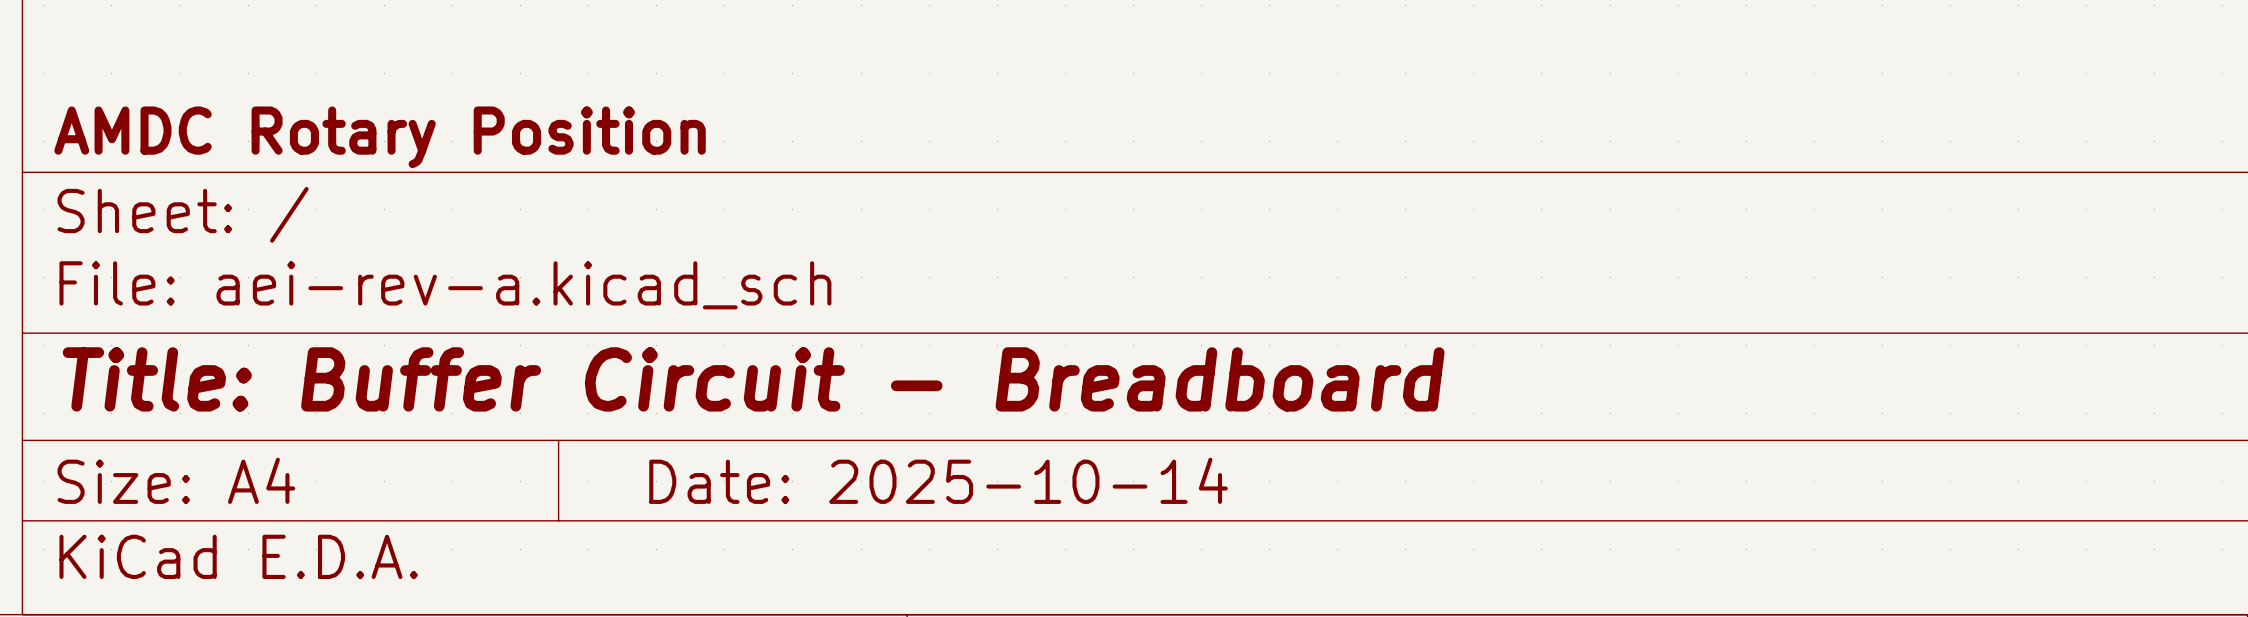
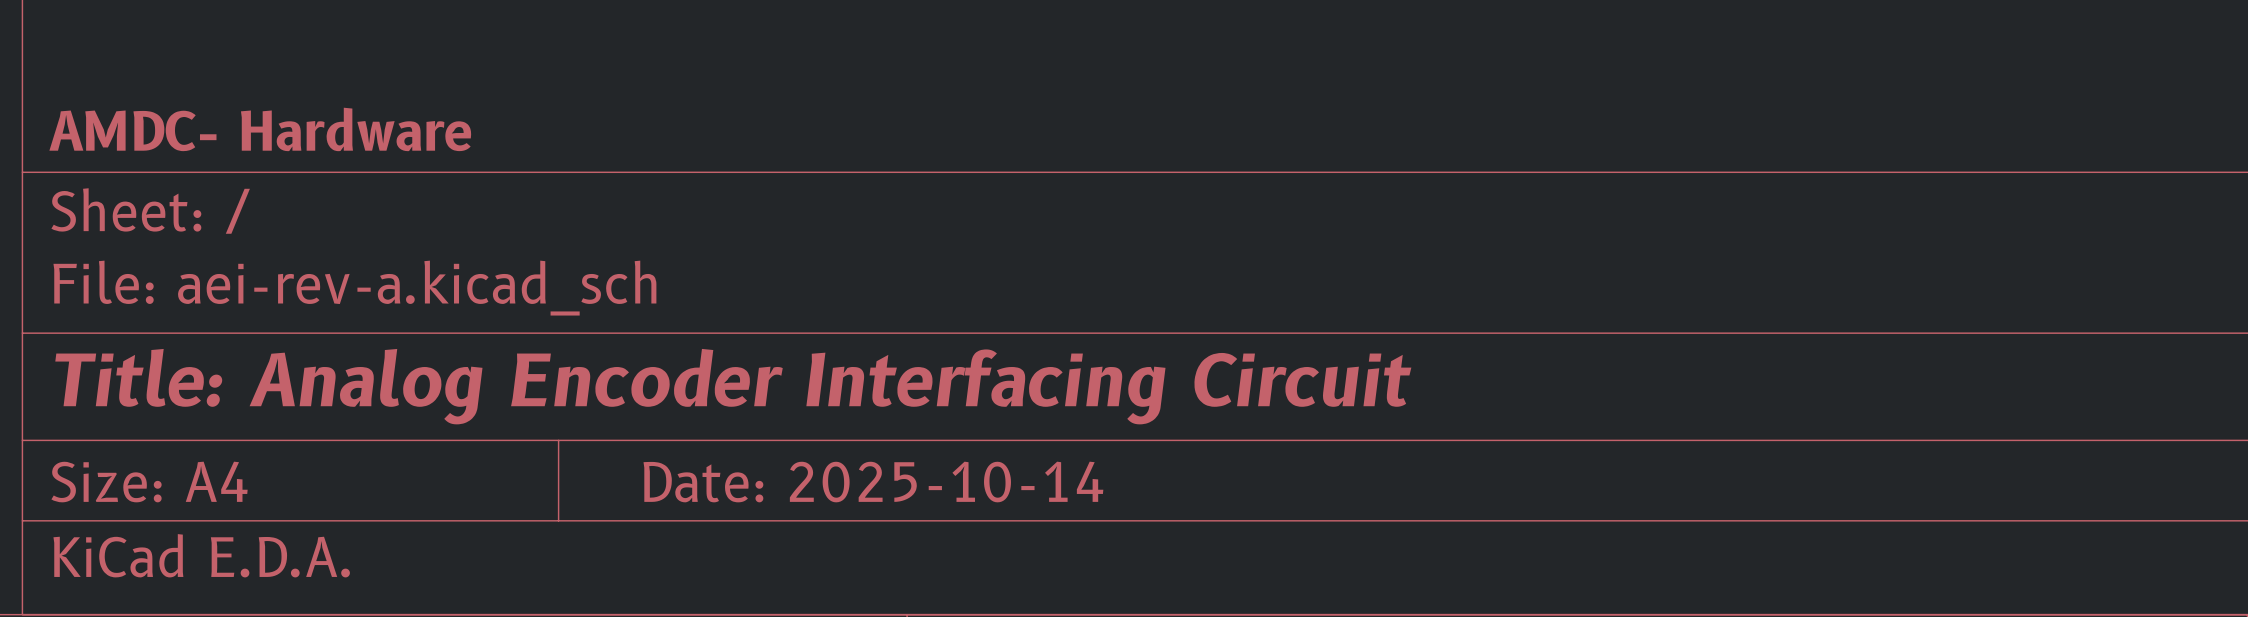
title block: AMDC Rotary Position (380, 137) -> AMDC- Hardware (260, 129)
title block: Title: Buffer Circuit - Breadboard (753, 379) -> Title: Analog Encoder Interfacing Circuit (733, 386)

